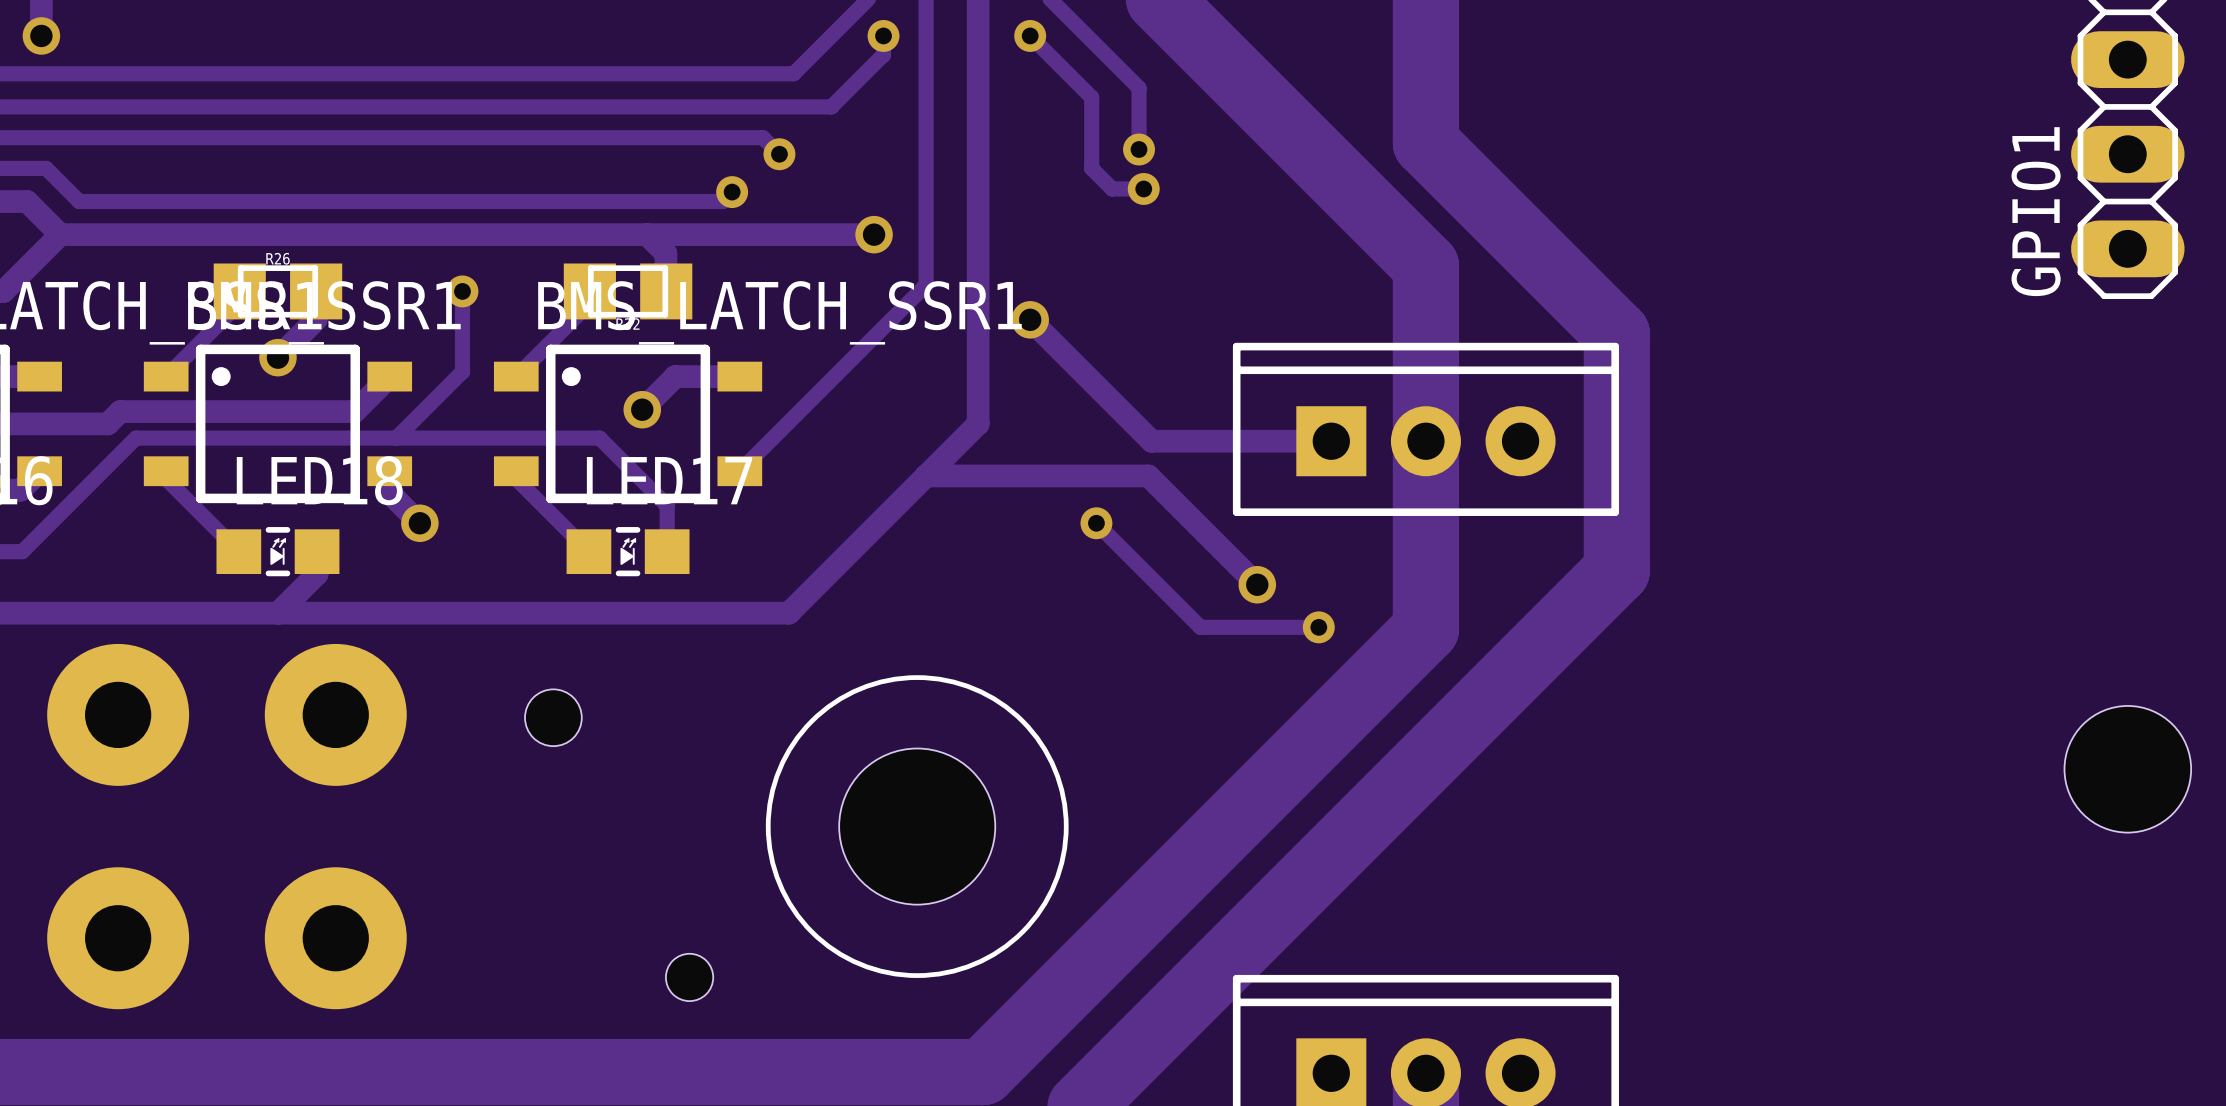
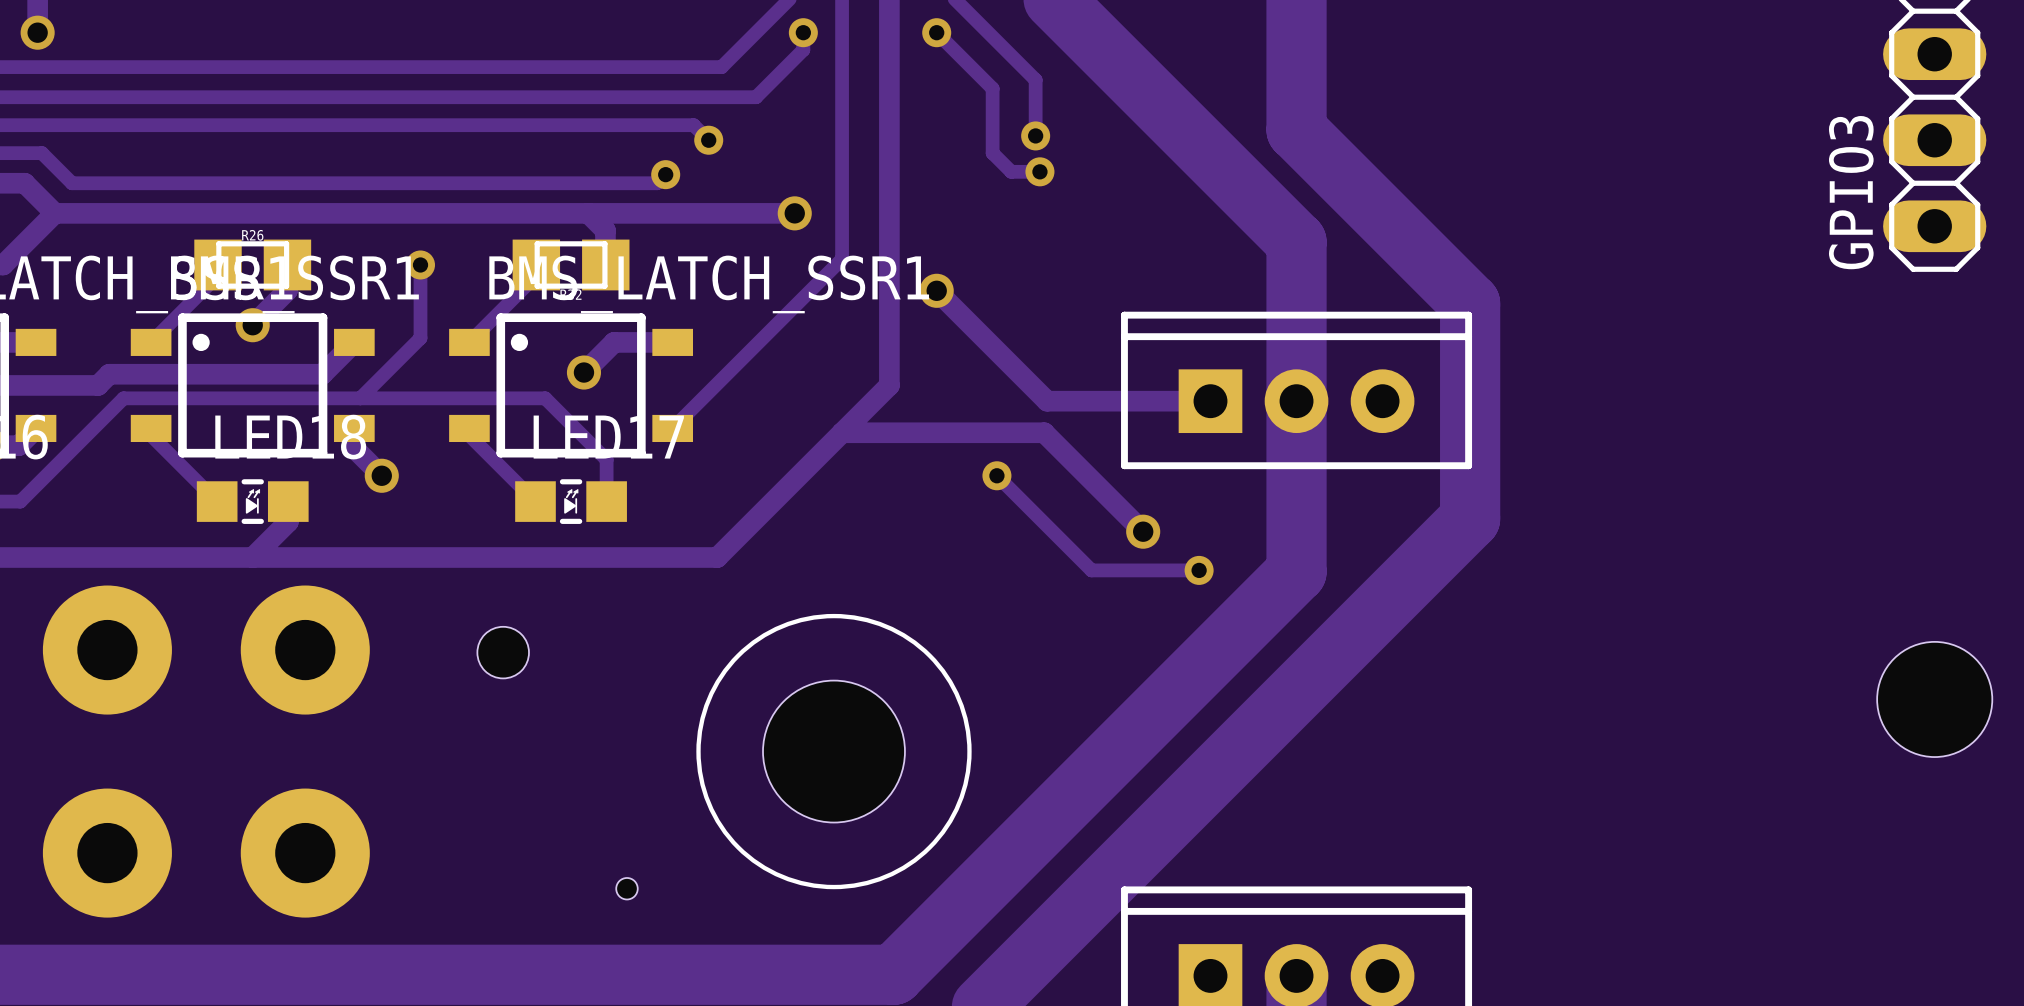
GPIO1 name: GPIO1 (2036, 211) -> GPIO3 (1851, 192)
hole size: [665, 953, 714, 1002] -> [616, 877, 638, 900]

